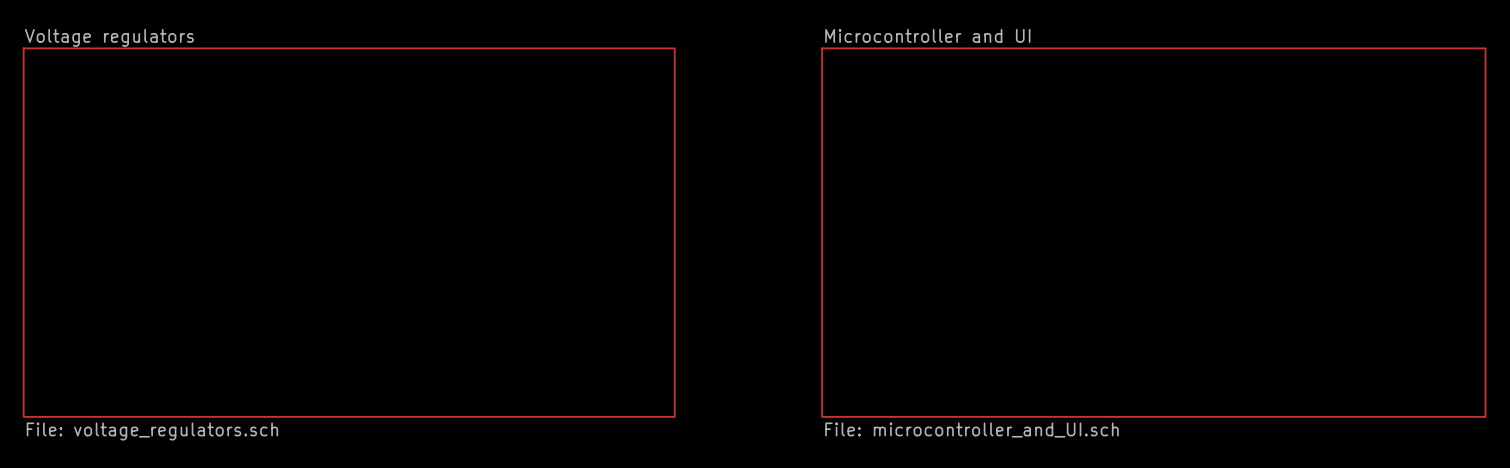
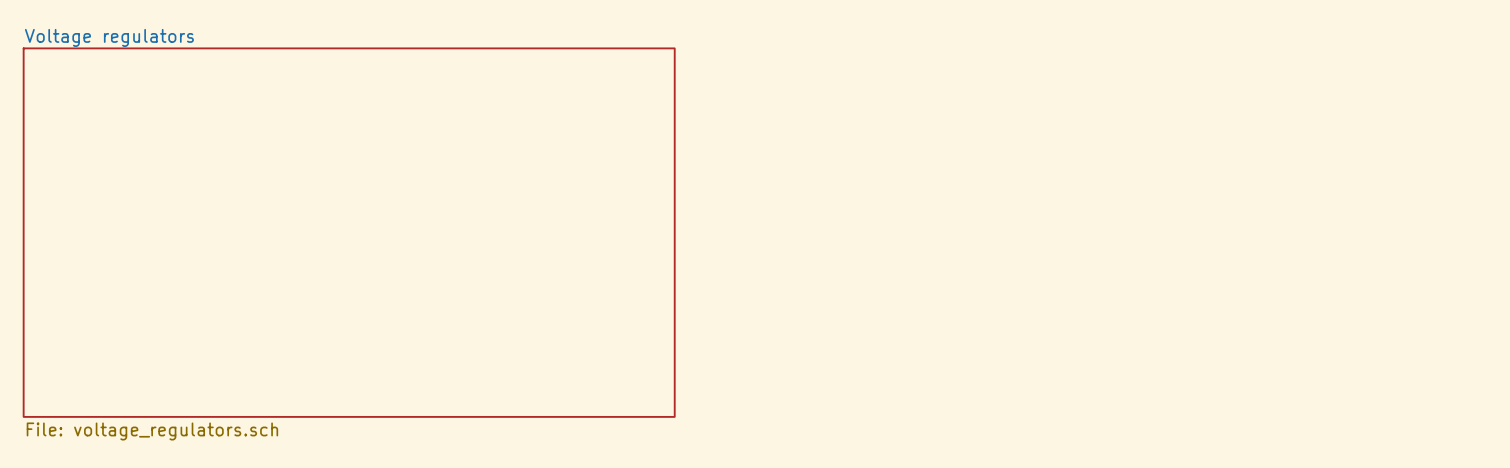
sheet Microcontroller and UI: File: microcontroller_and_UI.sch (1153, 232) -> none

